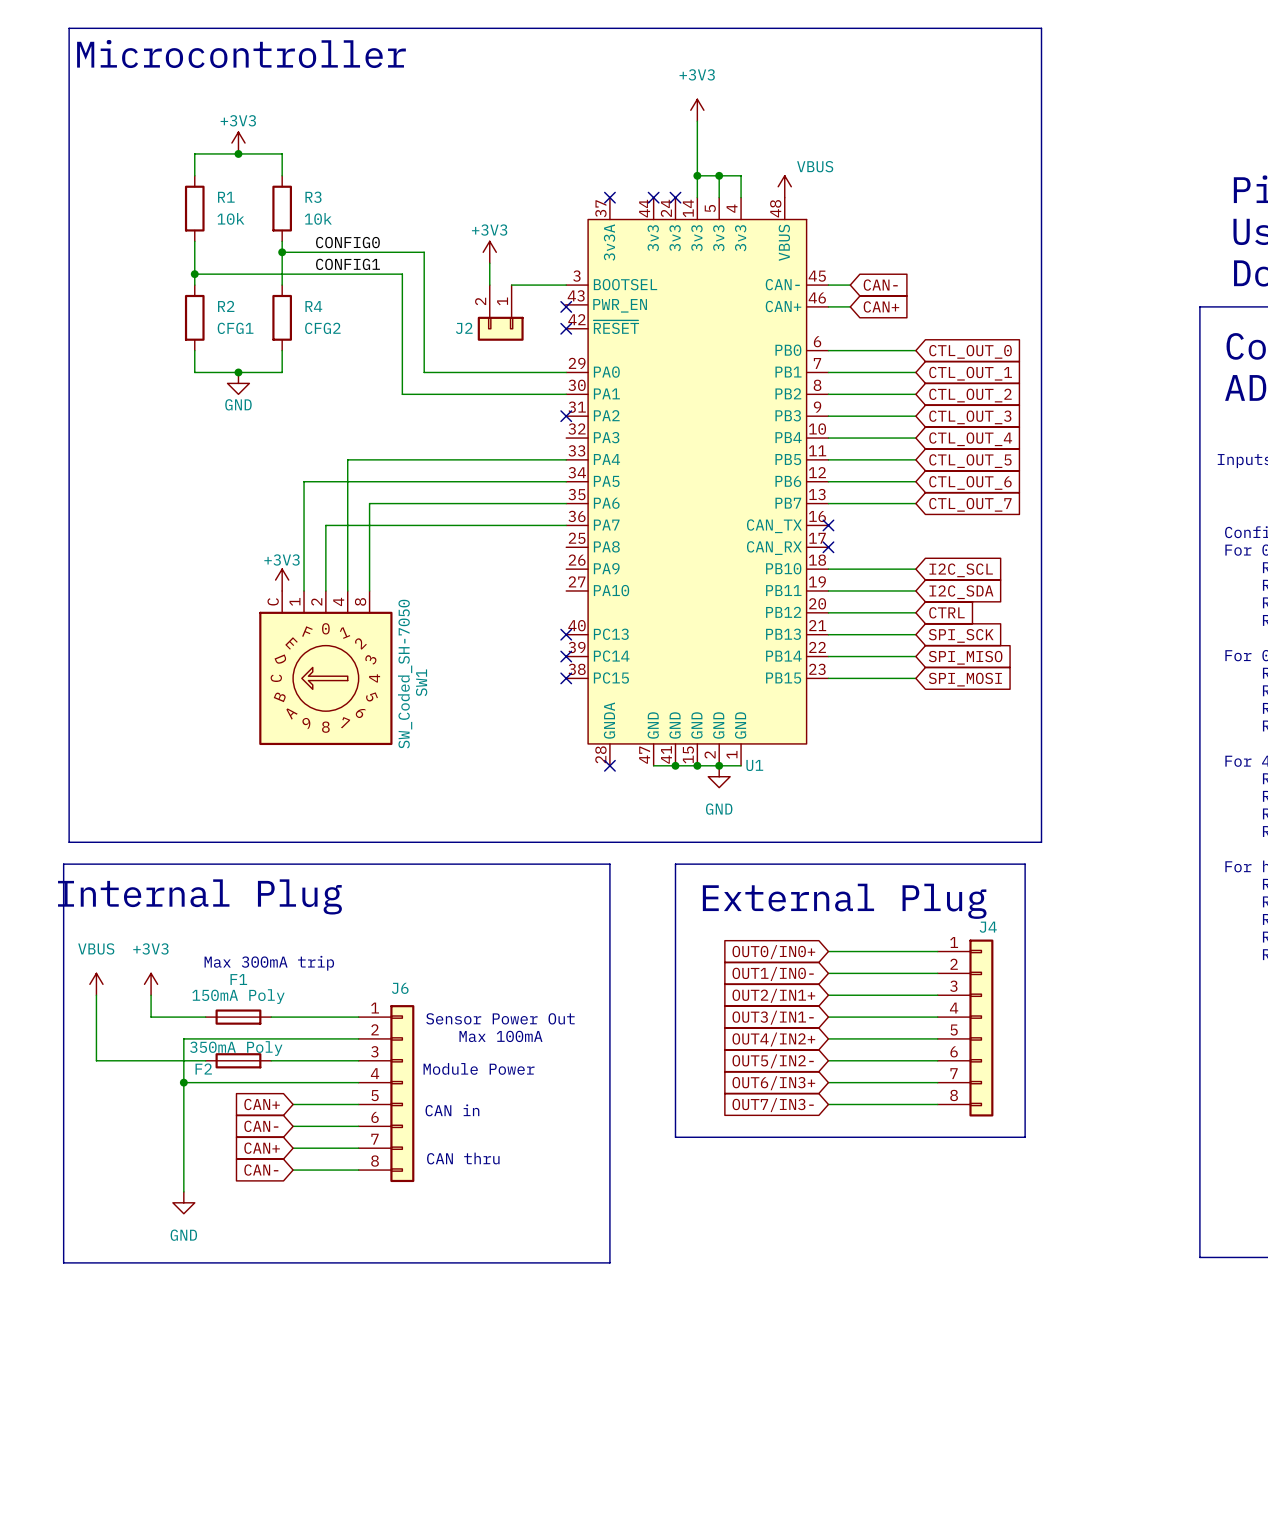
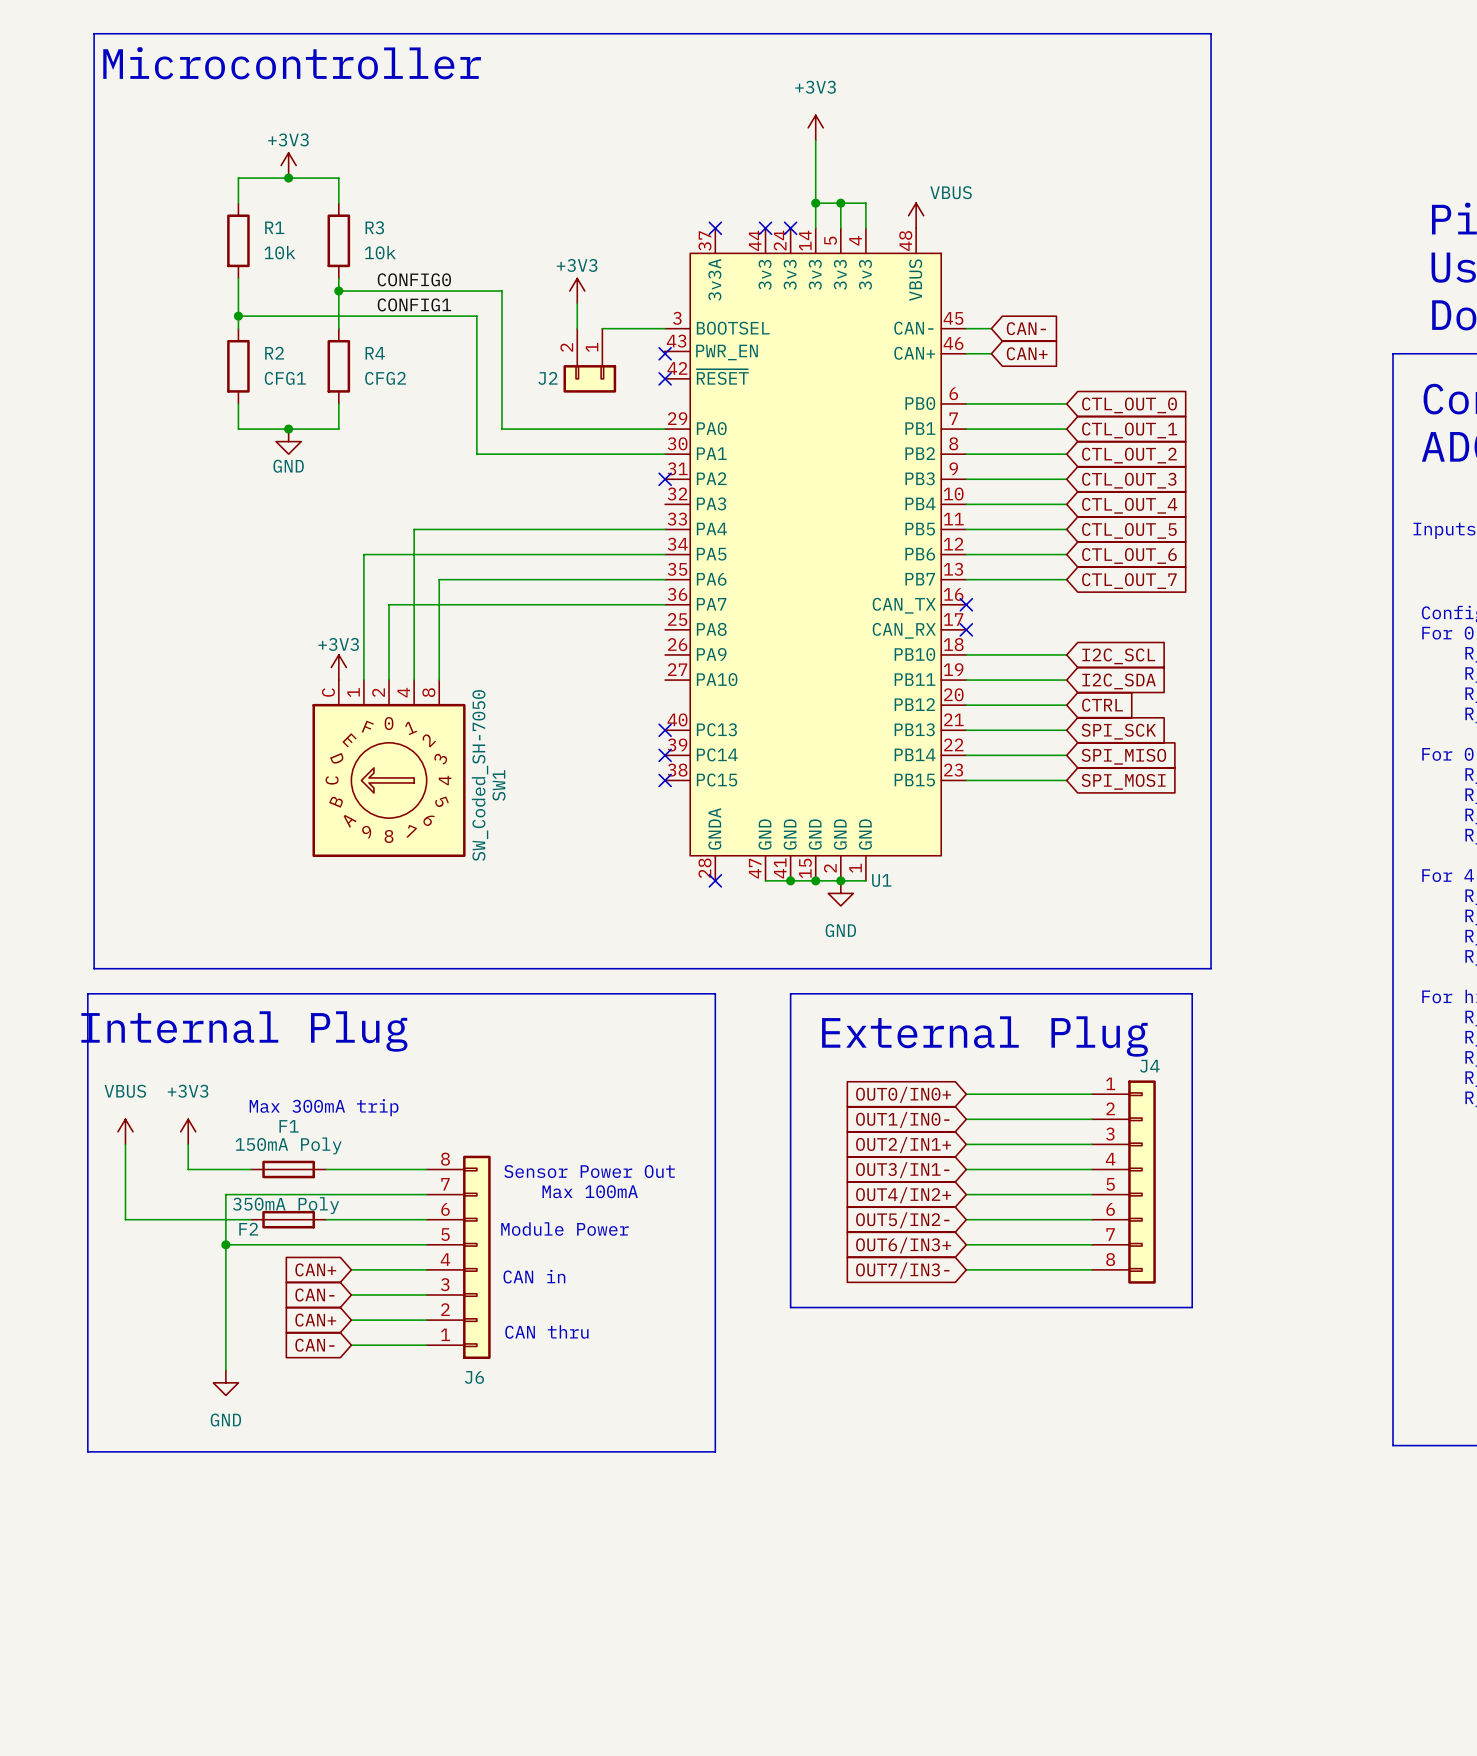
J6 flip: as is (402, 1093) -> up-down (476, 1257)

